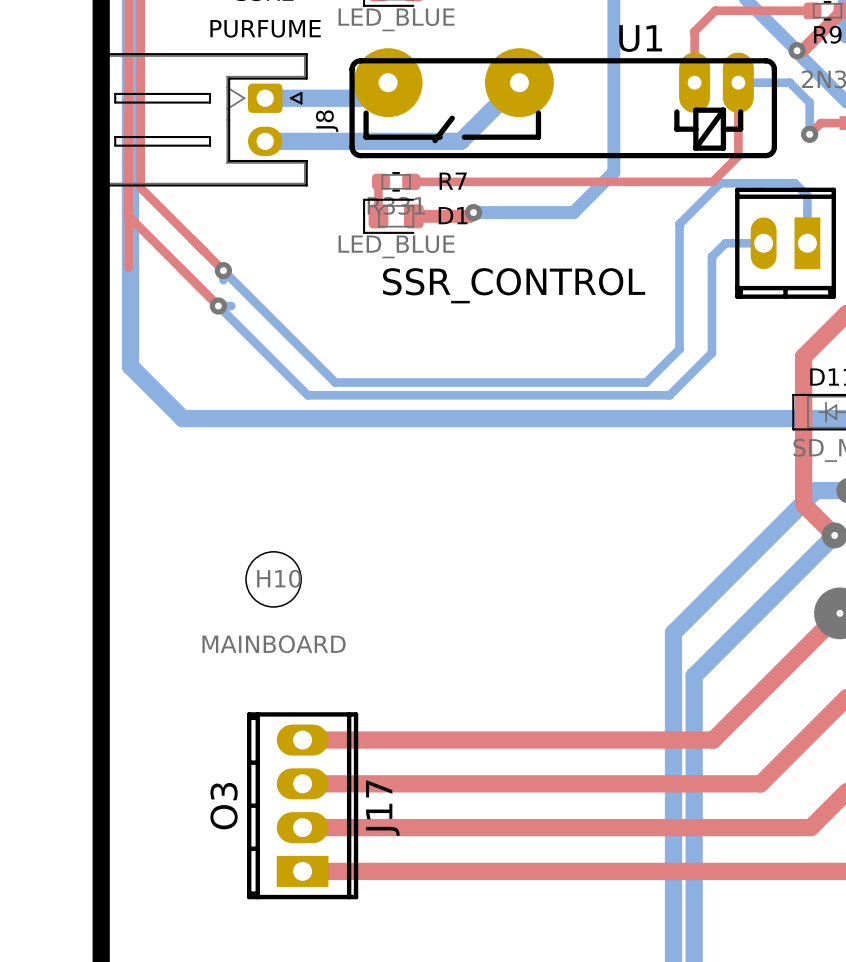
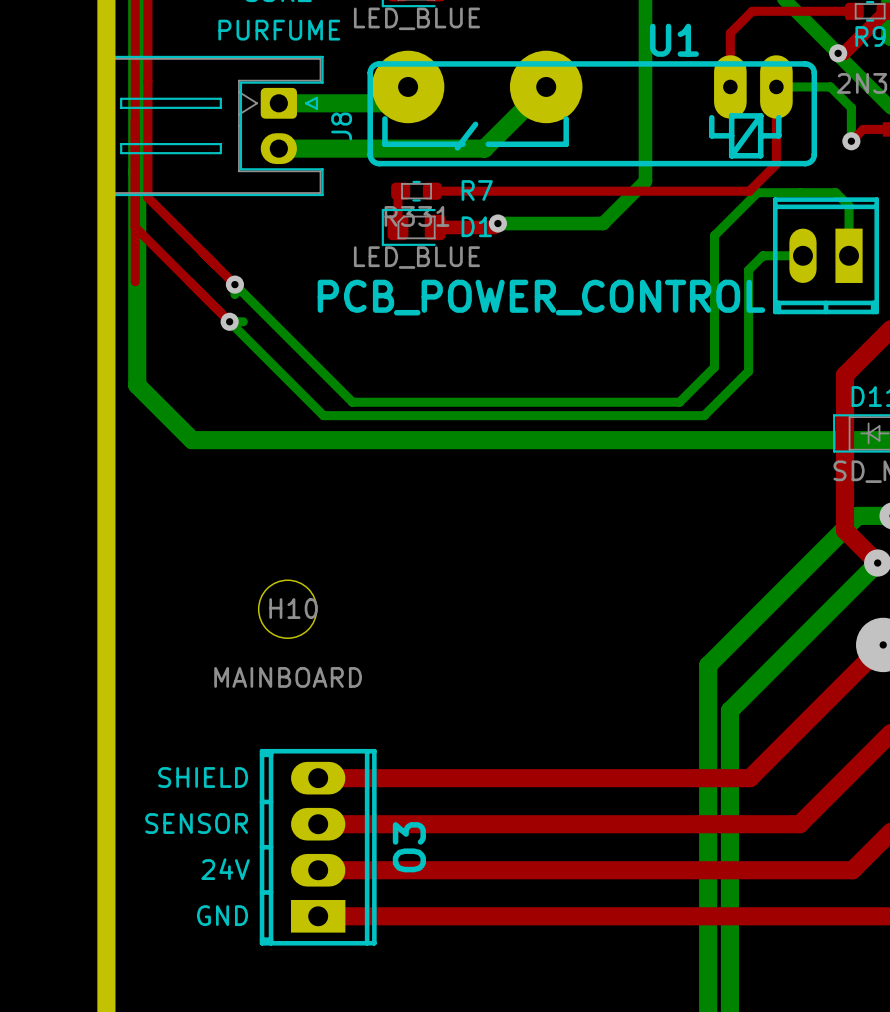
part value: SSR_CONTROL (514, 285) -> PCB_POWER_CONTROL (541, 297)
J17 text: none -> SHIELD (203, 777)
J17 text: none -> SENSOR (196, 823)
J17 value position: O3 (224, 806) -> O3 (409, 847)
J17 name: J17 (382, 808) -> none
J17 text: none -> 24V (225, 869)
J17 text: none -> GND (222, 915)

